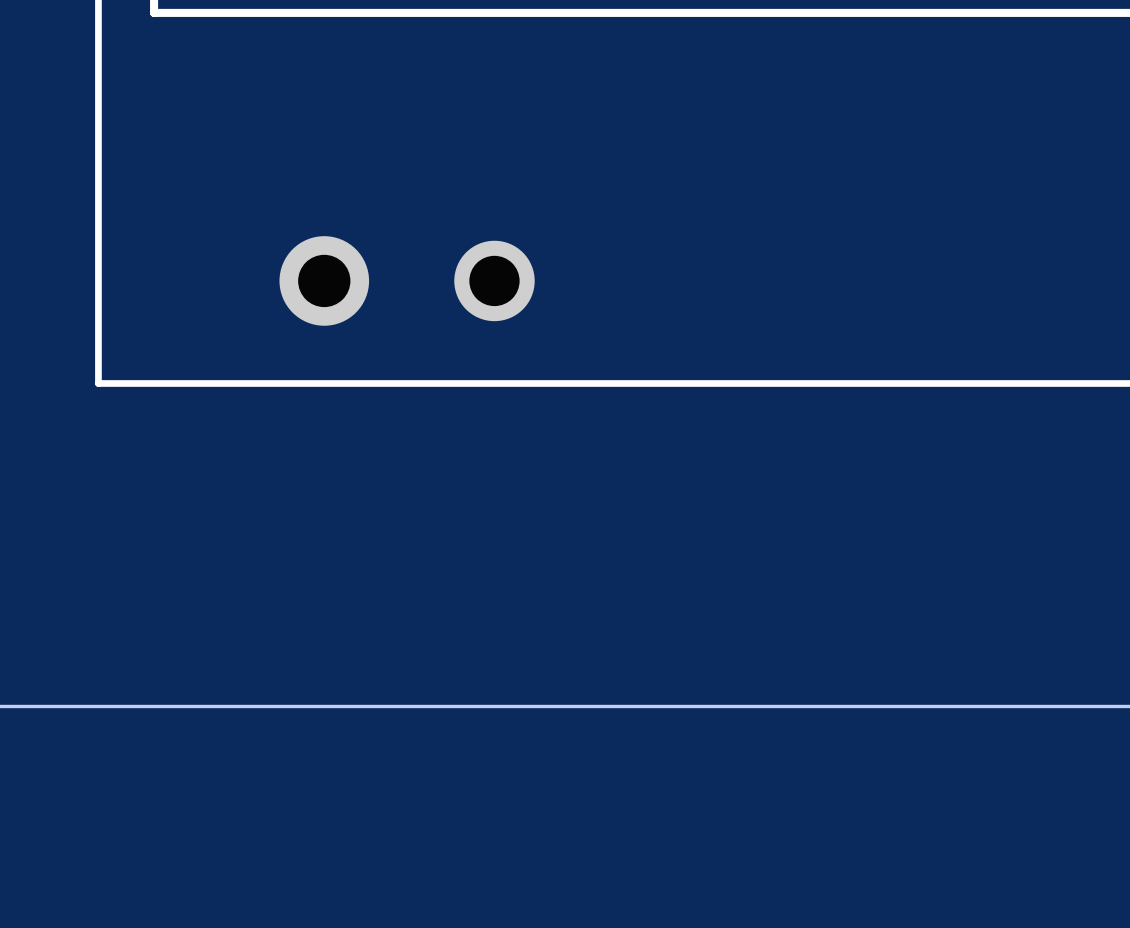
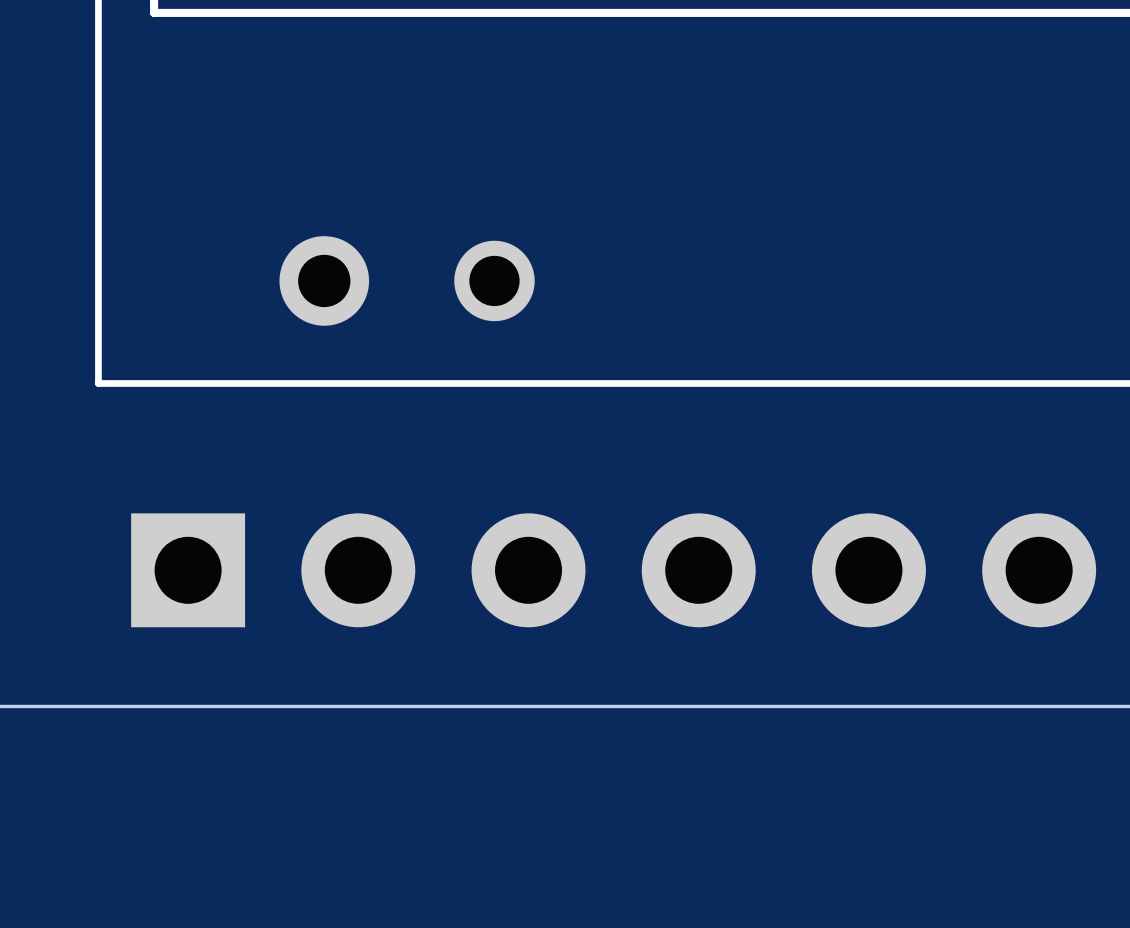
part: none -> (613, 570)

